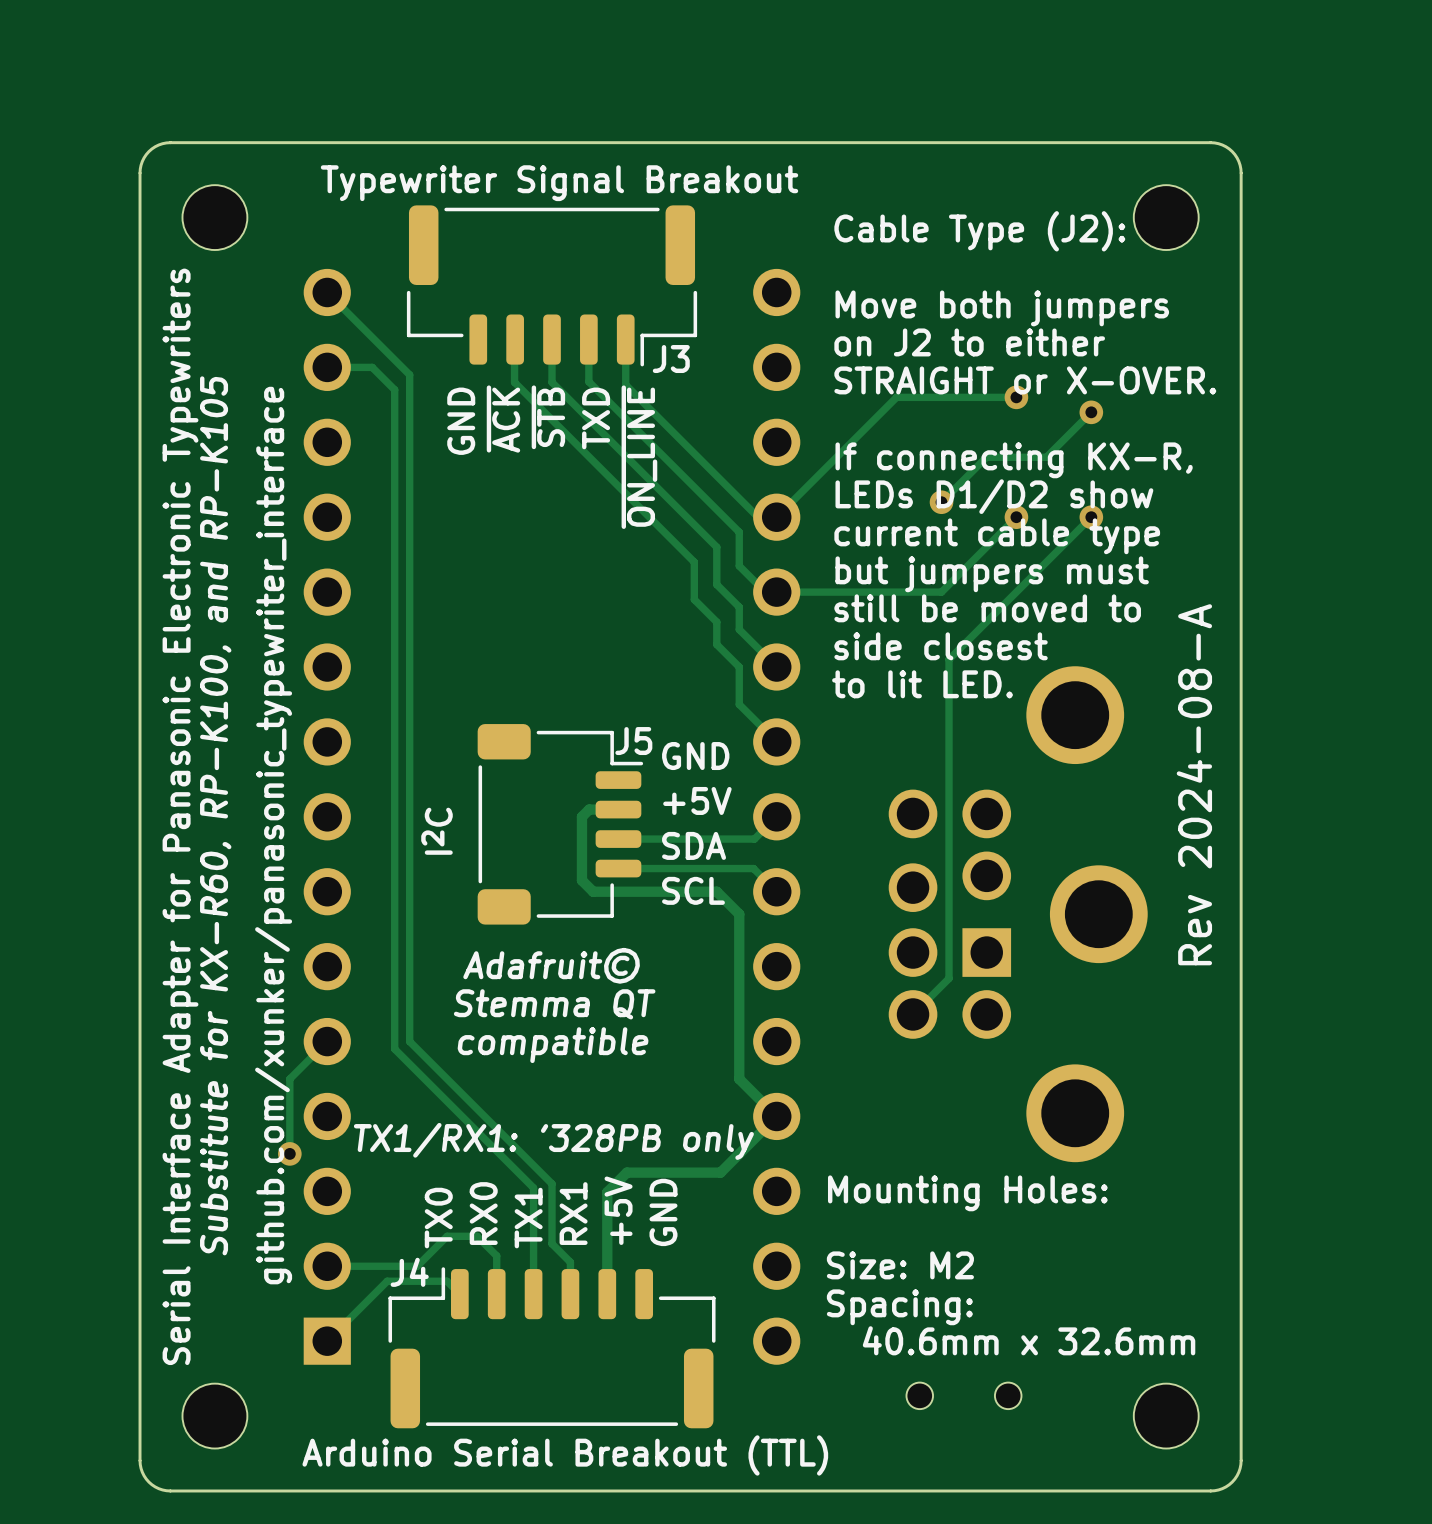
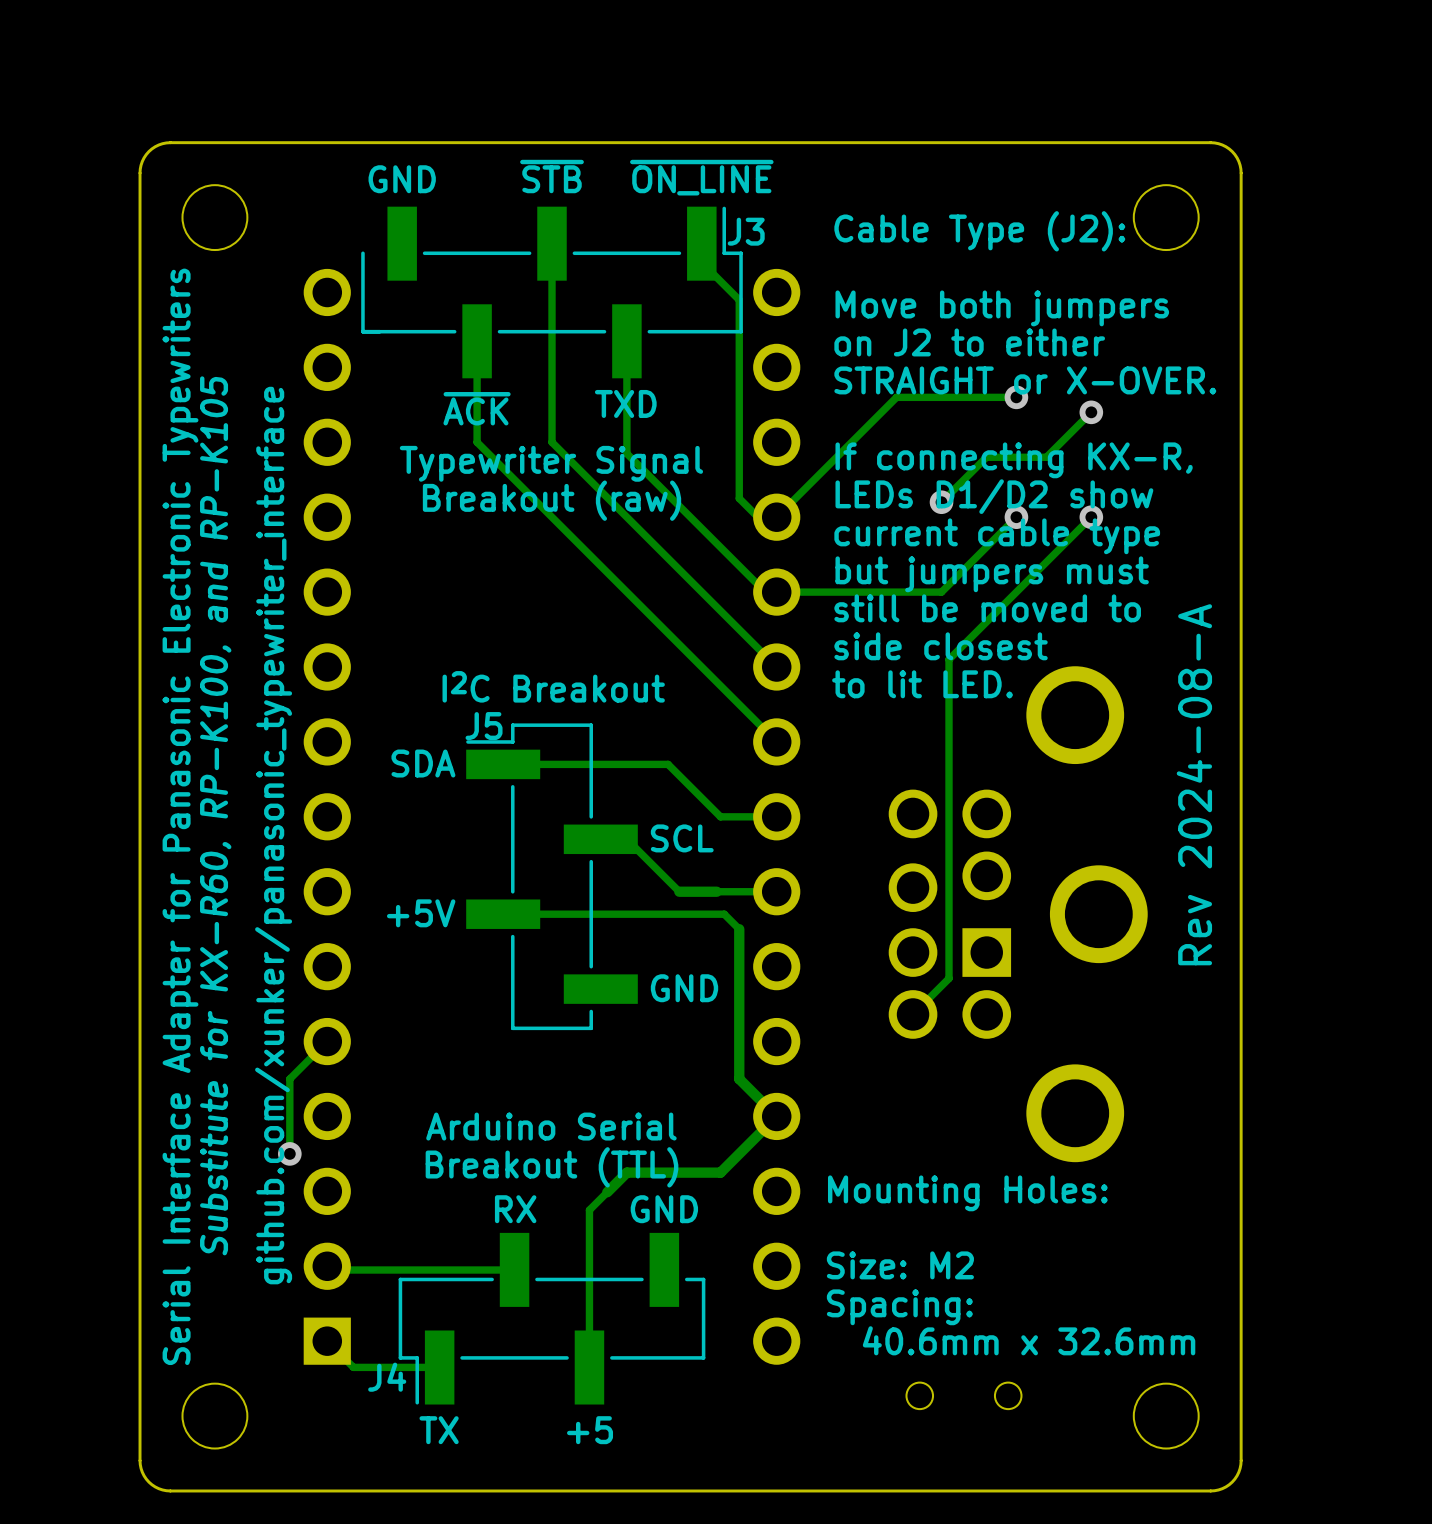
text: Typewriter Signal Breakout (559, 183) -> none
J3 footprint: [406, 205, 698, 367] -> [361, 206, 743, 379]
track: none -> (552, 243) (552, 339)
track: (327, 292) (409, 374) (409, 1041) (552, 1183) (552, 1243) (570, 1262) (570, 1294) -> none
track: (515, 339) (514, 382) (694, 562) (694, 599) (716, 622) (716, 644) (739, 667) (739, 704) -> (477, 341) (477, 442) (739, 704)
track: (588, 339) (588, 381) (739, 532) (739, 566) -> (626, 341) (626, 453) (739, 566)
track: (625, 339) (625, 384) (739, 498) -> (701, 243) (701, 262) (739, 299) (739, 498)
J3 name position: J3 (671, 359) -> J3 (746, 231)
track: (327, 367) (372, 367) (394, 389) (394, 1049) (533, 1187) (533, 1294) -> none
track: (552, 382) (716, 547) (716, 584) (739, 607) (739, 629) -> (552, 382) (552, 442) (739, 629)
text rotation: 0° (548, 417) -> 90° clockwise (552, 176)
text position: ~{STB} (548, 417) -> ~{STB} (552, 176)
text rotation: 0° (596, 418) -> 90° clockwise (625, 403)
text rotation: 0° (503, 419) -> 90° clockwise (477, 408)
text rotation: 0° (461, 421) -> 90° clockwise (402, 179)
text position: GND (461, 421) -> GND (402, 179)
text rotation: 0° (639, 457) -> 90° clockwise (701, 177)
text position: ~{ON_LINE} (639, 457) -> ~{ON_LINE} (701, 177)
text: none -> Typewriter Signal (551, 463)
text: none -> Breakout (raw) (552, 500)
text: none -> I2C Breakout (553, 686)
J5 footprint: [477, 724, 644, 925] -> [466, 723, 638, 1031]
J5 name position: J5 (633, 741) -> J5 (484, 726)
text: GND (695, 756) -> none
text: +5V (697, 800) -> none
track: (618, 809) (589, 809) (581, 816) (581, 880) (593, 891) (679, 891) -> (600, 839) (626, 839) (679, 891)
track: (776, 816) (754, 839) (618, 839) -> (776, 816) (720, 816) (668, 764) (503, 764)
text: I2C (436, 831) -> none
text position: SDA (694, 845) -> SDA (423, 763)
track: (618, 868) (753, 868) (776, 891) -> none
text position: SCL (693, 890) -> SCL (682, 838)
track: (716, 891) (739, 914) (739, 929) -> (716, 891) (776, 891)
text: none -> +5V (421, 913)
track: none -> (503, 914) (724, 914) (739, 929)
text: Adafruit© (551, 965) -> none
text: none -> GND (684, 988)
text: Stemma QT (554, 1004) -> none
text: compatible (553, 1045) -> none
text: TX1/RX1: '328PB only (553, 1141) -> Arduino Serial (551, 1126)
text: none -> Breakout (TTL) (552, 1167)
track: (607, 1192) (607, 1294) -> (607, 1192) (589, 1210) (589, 1367)
text: +5V (618, 1210) -> none
text rotation: 0° (663, 1212) -> 90° clockwise (664, 1209)
text: RX0 (483, 1213) -> RX (515, 1209)
text: RX1 (573, 1213) -> none
text: TX0 (438, 1218) -> none
text: TX1 (528, 1218) -> none
track: (327, 1266) (417, 1266) (447, 1236) (477, 1236) (496, 1255) (496, 1294) -> (327, 1266) (331, 1270) (514, 1270)
J4 footprint: [388, 1267, 716, 1429] -> [398, 1232, 706, 1405]
J4 name position: J4 (409, 1272) -> J4 (387, 1377)
track: (459, 1294) (446, 1281) (387, 1281) (327, 1341) -> (439, 1367) (353, 1367) (327, 1341)
text: none -> TX (439, 1430)
text: none -> +5 (590, 1430)
text: Arduino Serial Breakout (TTL) (565, 1455) -> none

